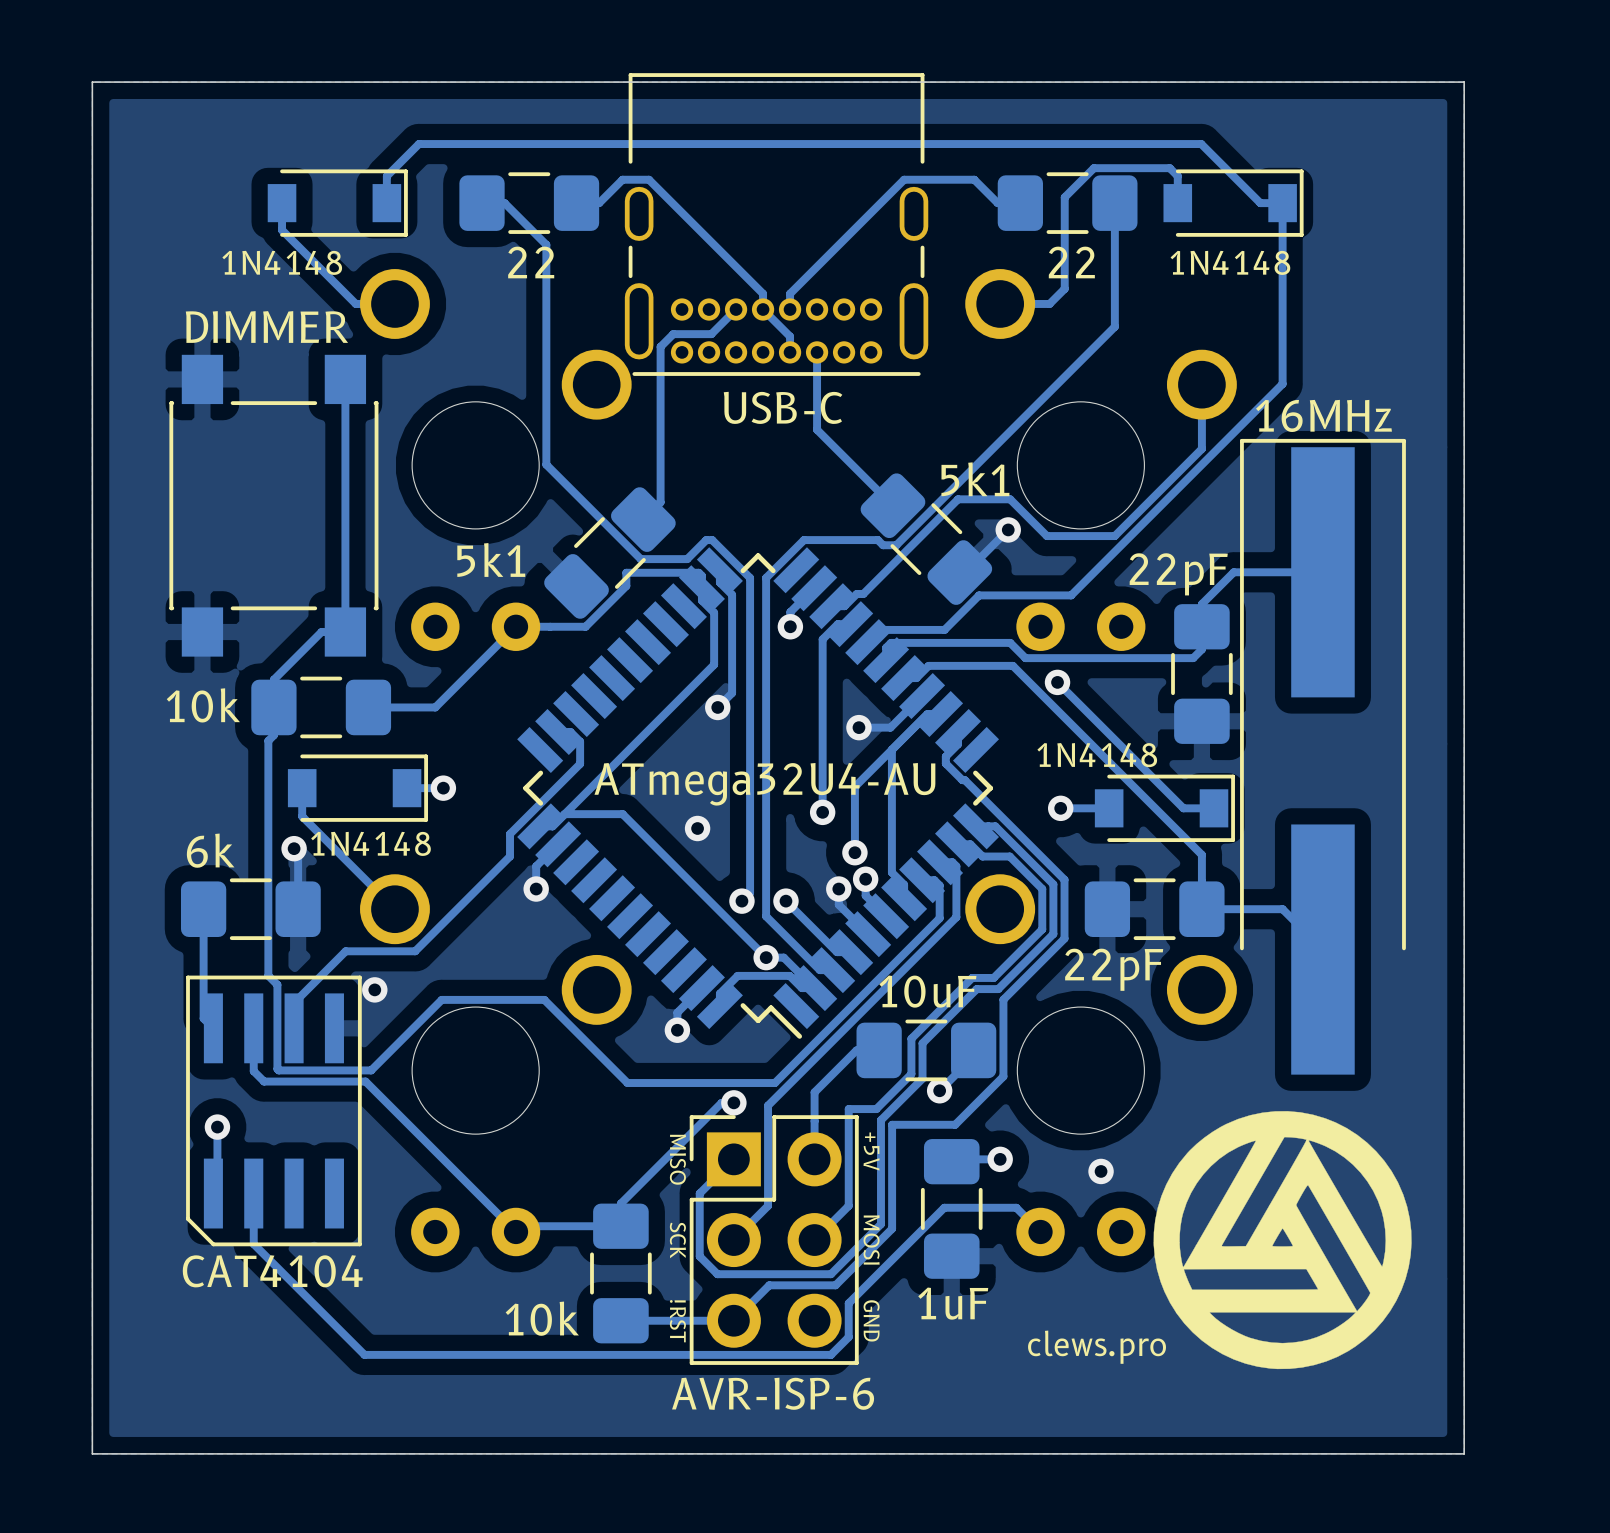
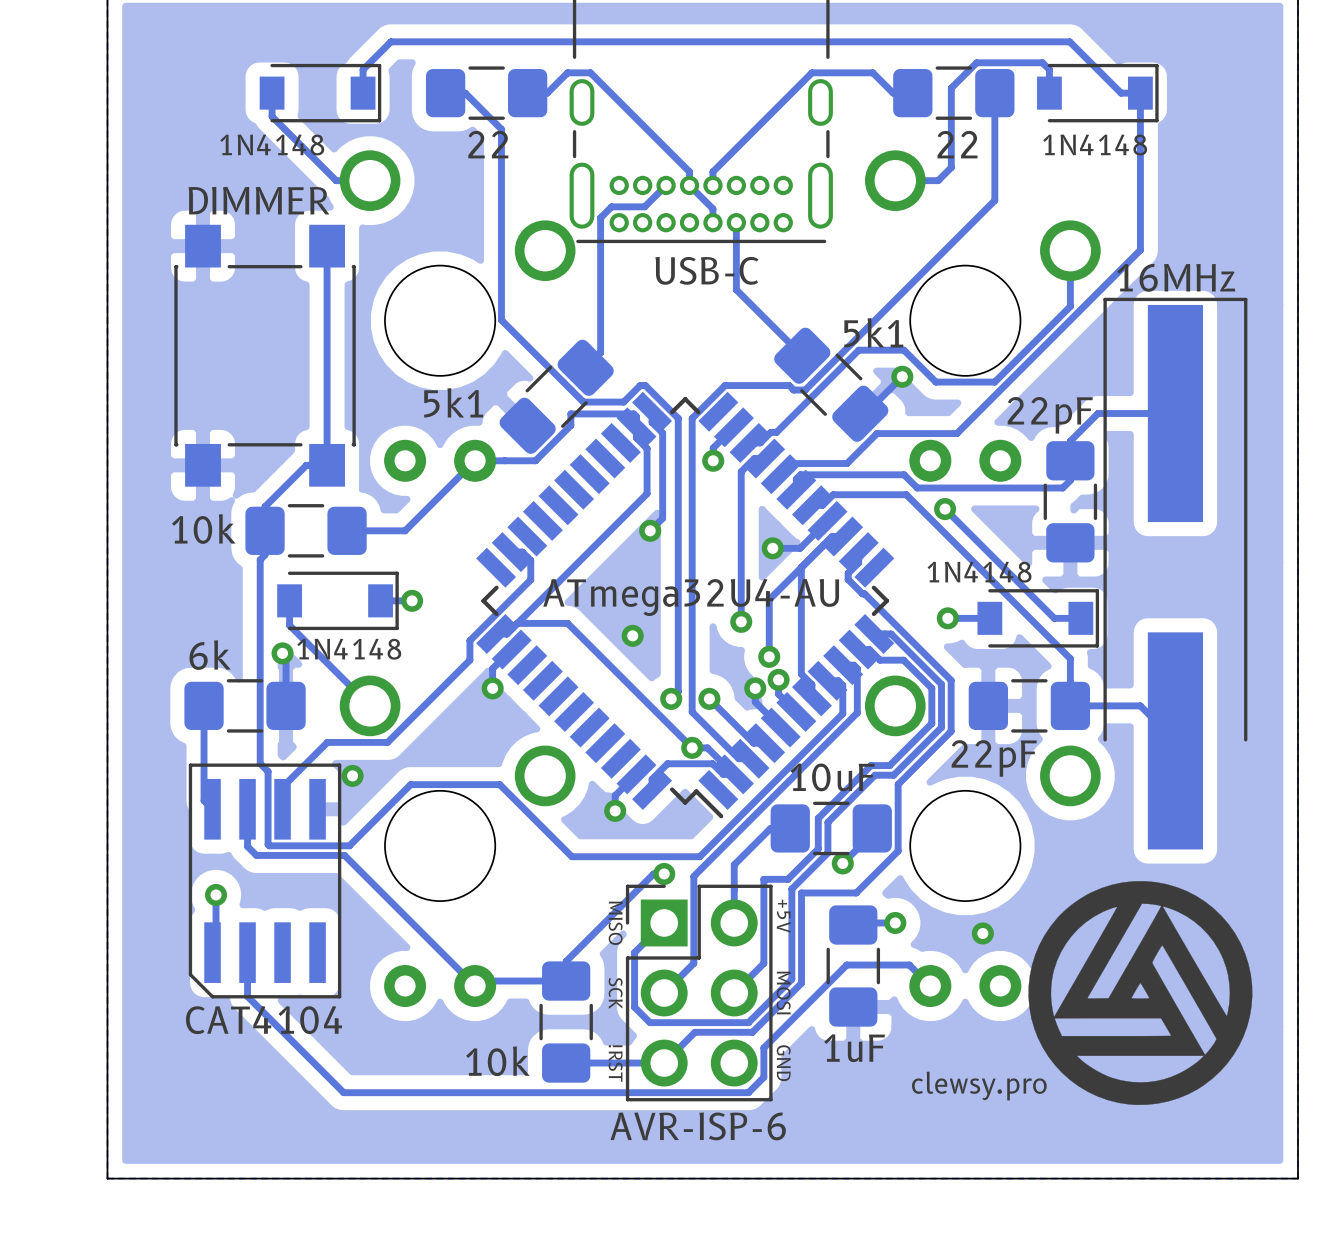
text: clews.pro (1097, 1347) -> clewsy.pro (979, 1086)

